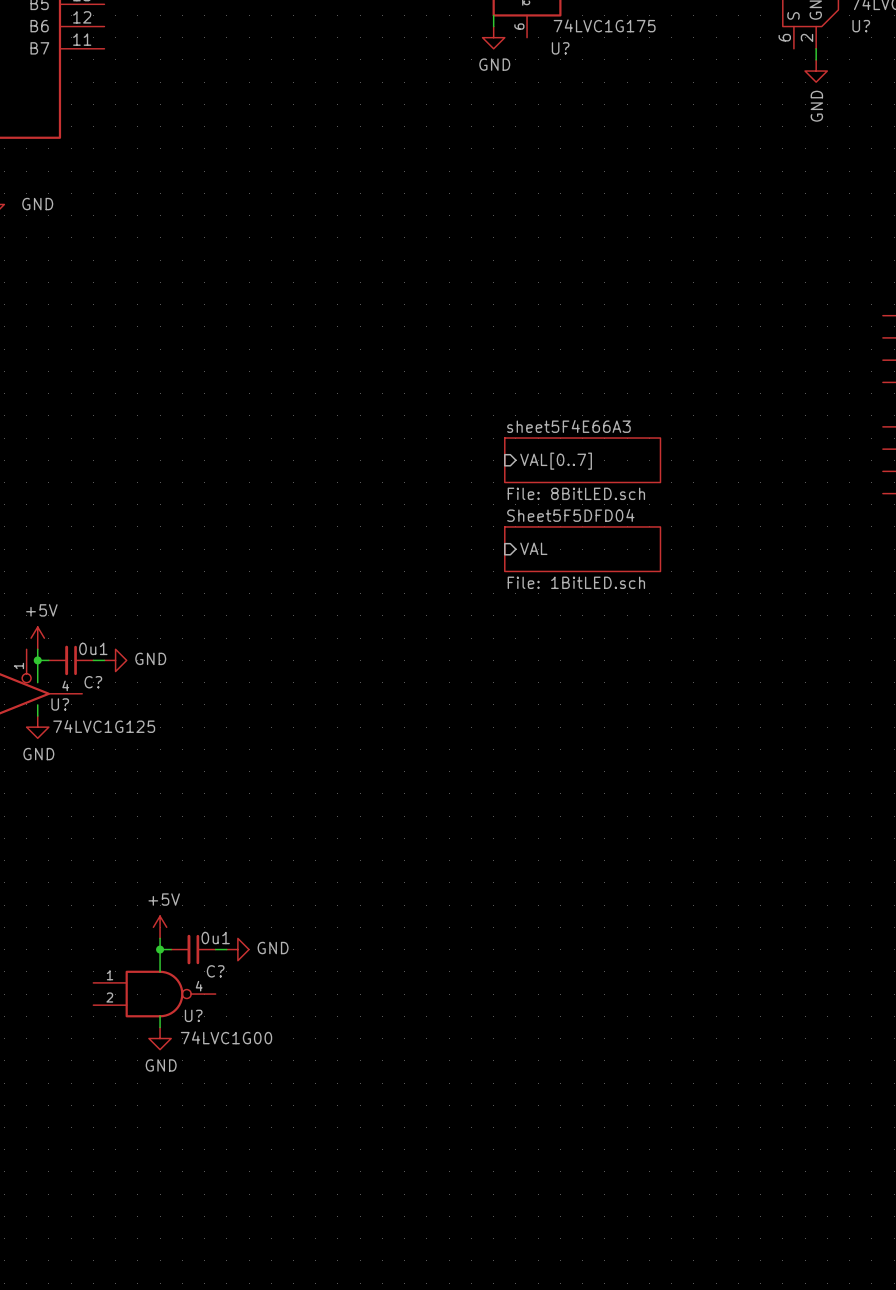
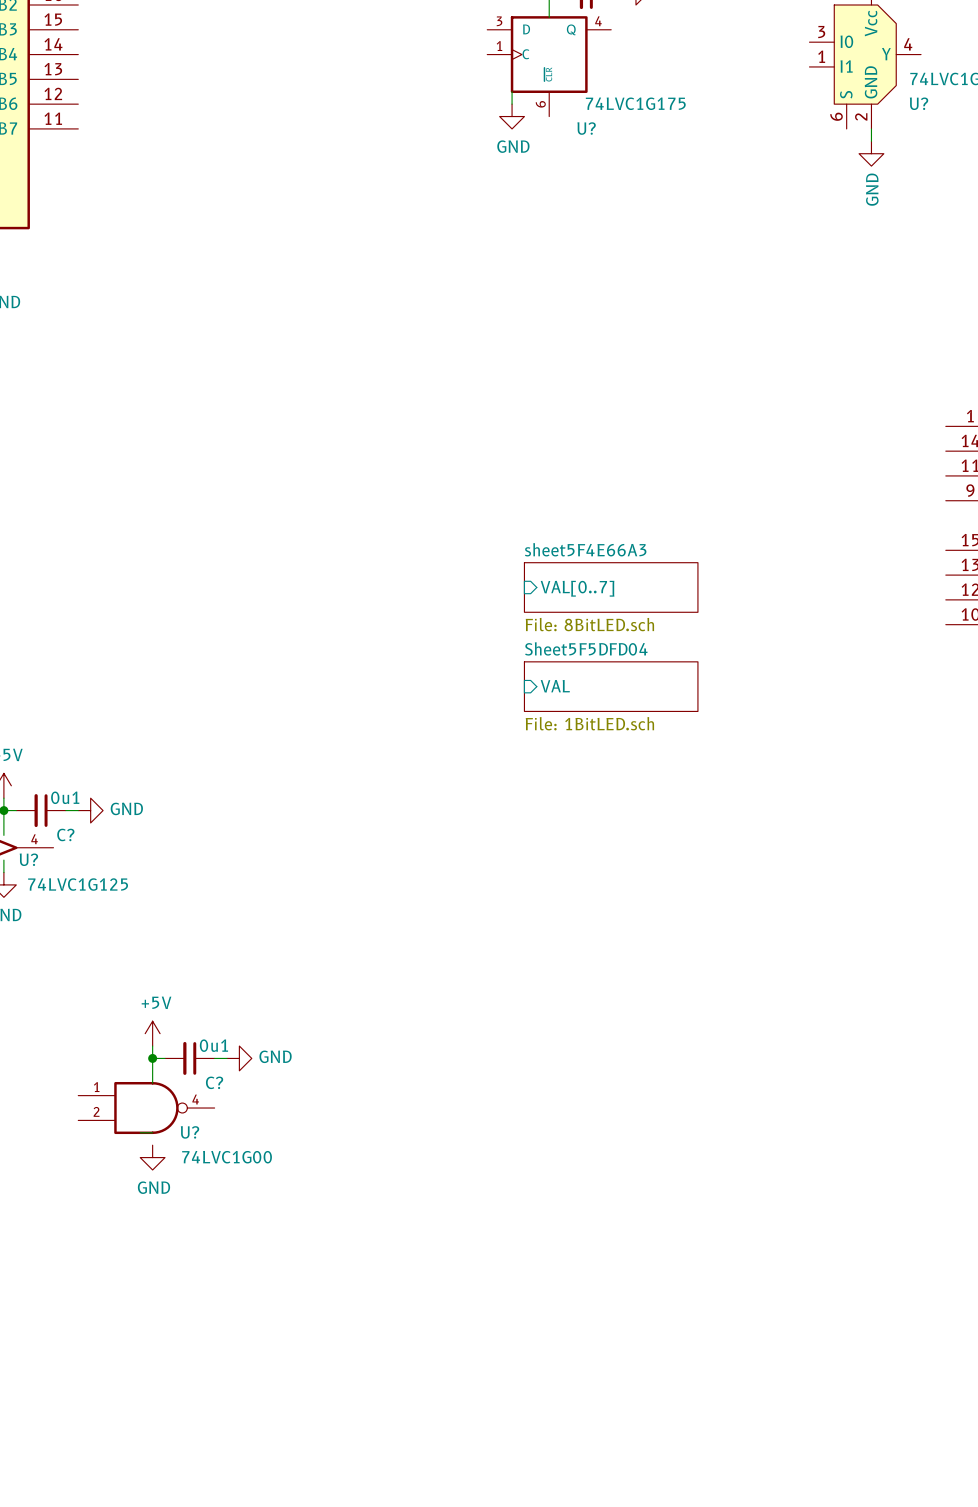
wire: none -> (152, 1058) (165, 1058)
junction: none -> (152, 1058)
power symbol: none -> GND (239, 1058)
power symbol position: +5V (160, 927) -> +5V (152, 1033)
wire: (160, 938) (160, 971) -> (152, 1046) (152, 1083)
junction: (160, 949) -> none
C? position: (193, 949) -> (189, 1058)
wire: (215, 949) (226, 949) -> (214, 1058) (226, 1058)
power symbol: GND (237, 949) -> none
power symbol: none -> GND (152, 1157)
U? position: (154, 994) -> (146, 1108)
wire: (160, 1016) (160, 1027) -> none
power symbol: GND (160, 1038) -> none

